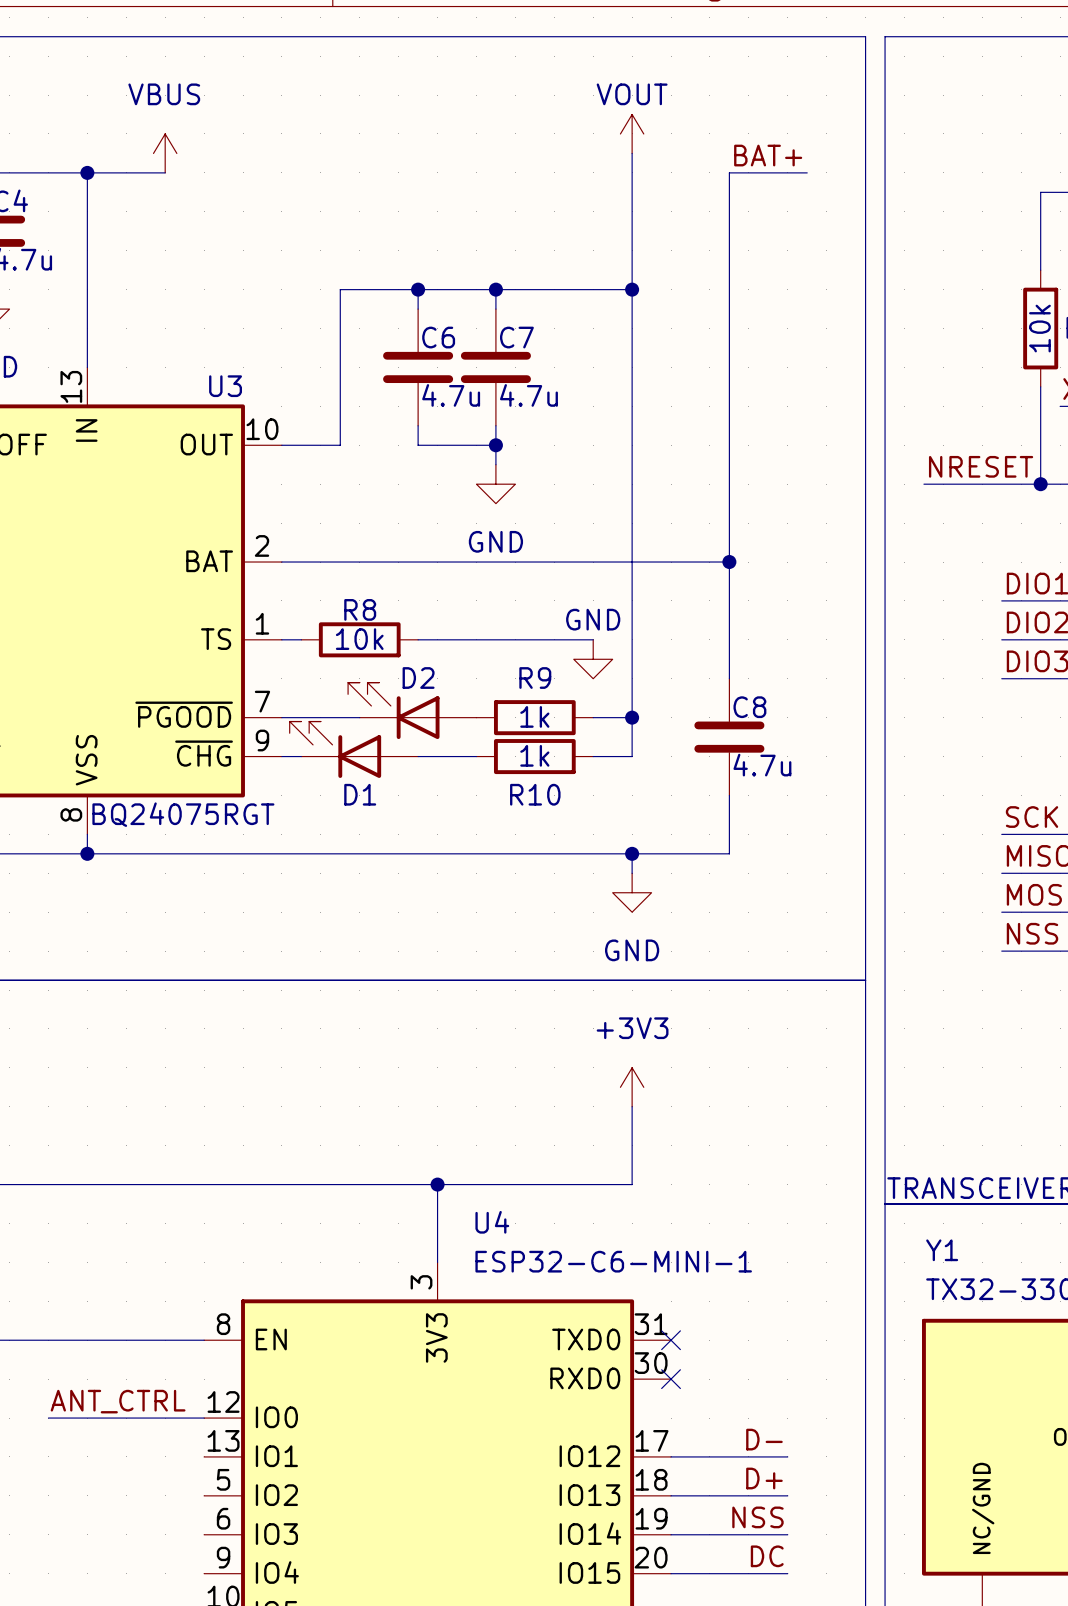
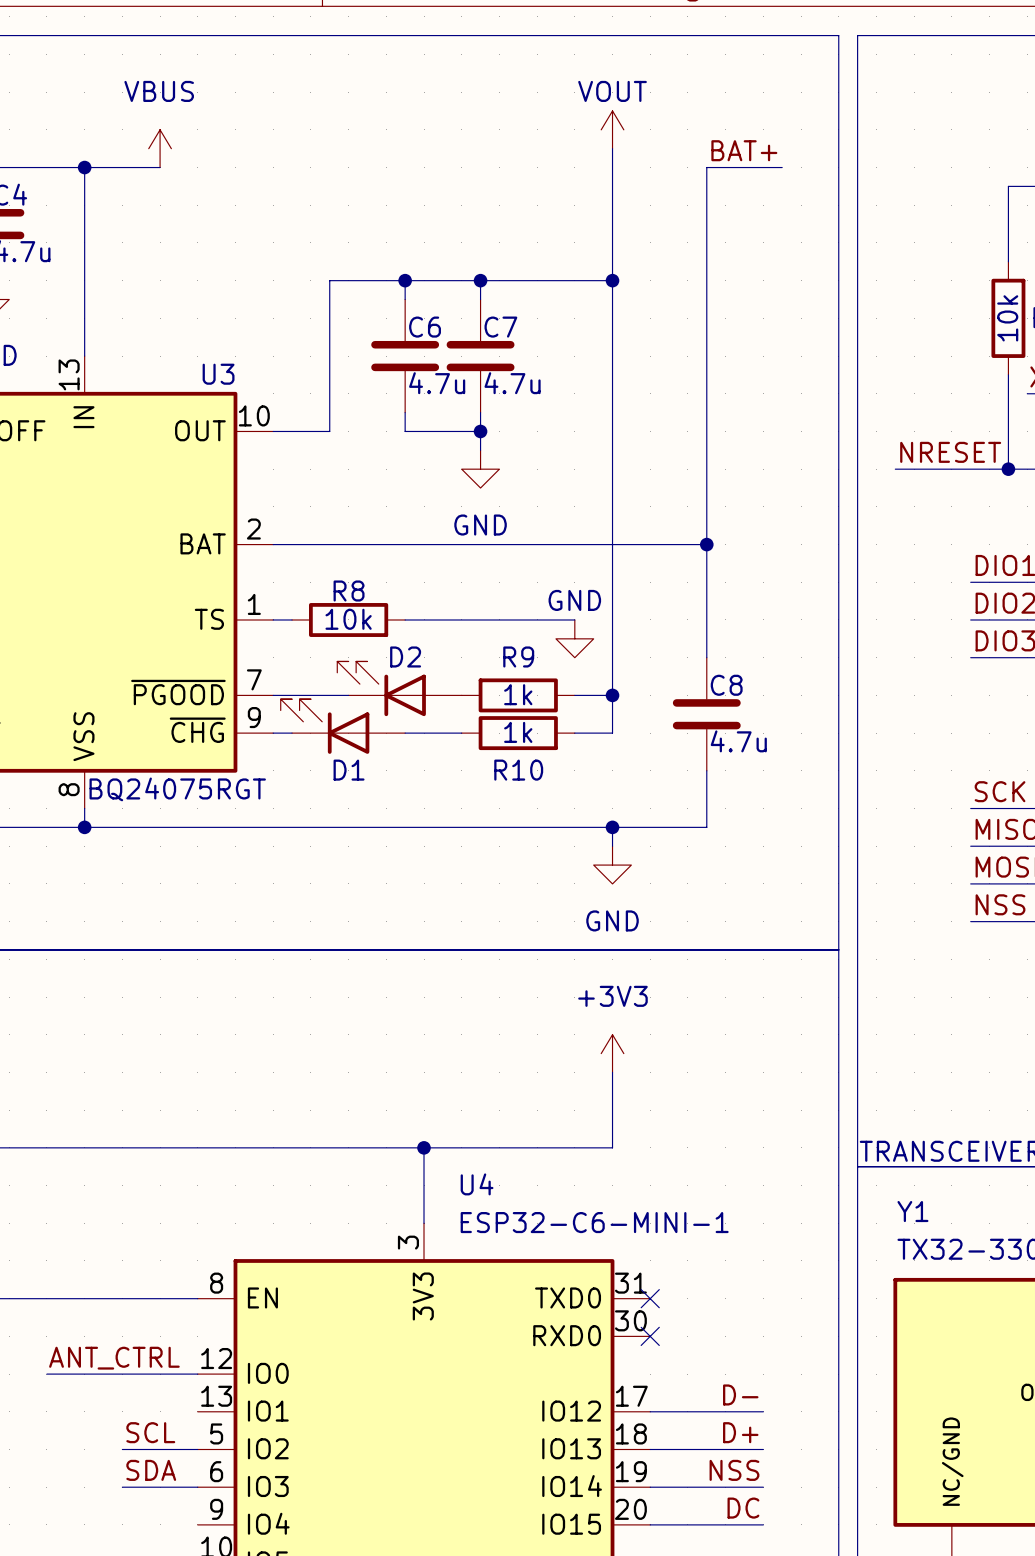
label: none -> SCL (150, 1432)
wire: none -> (122, 1449) (197, 1449)
label: none -> SDA (151, 1470)
wire: none -> (122, 1487) (197, 1487)

